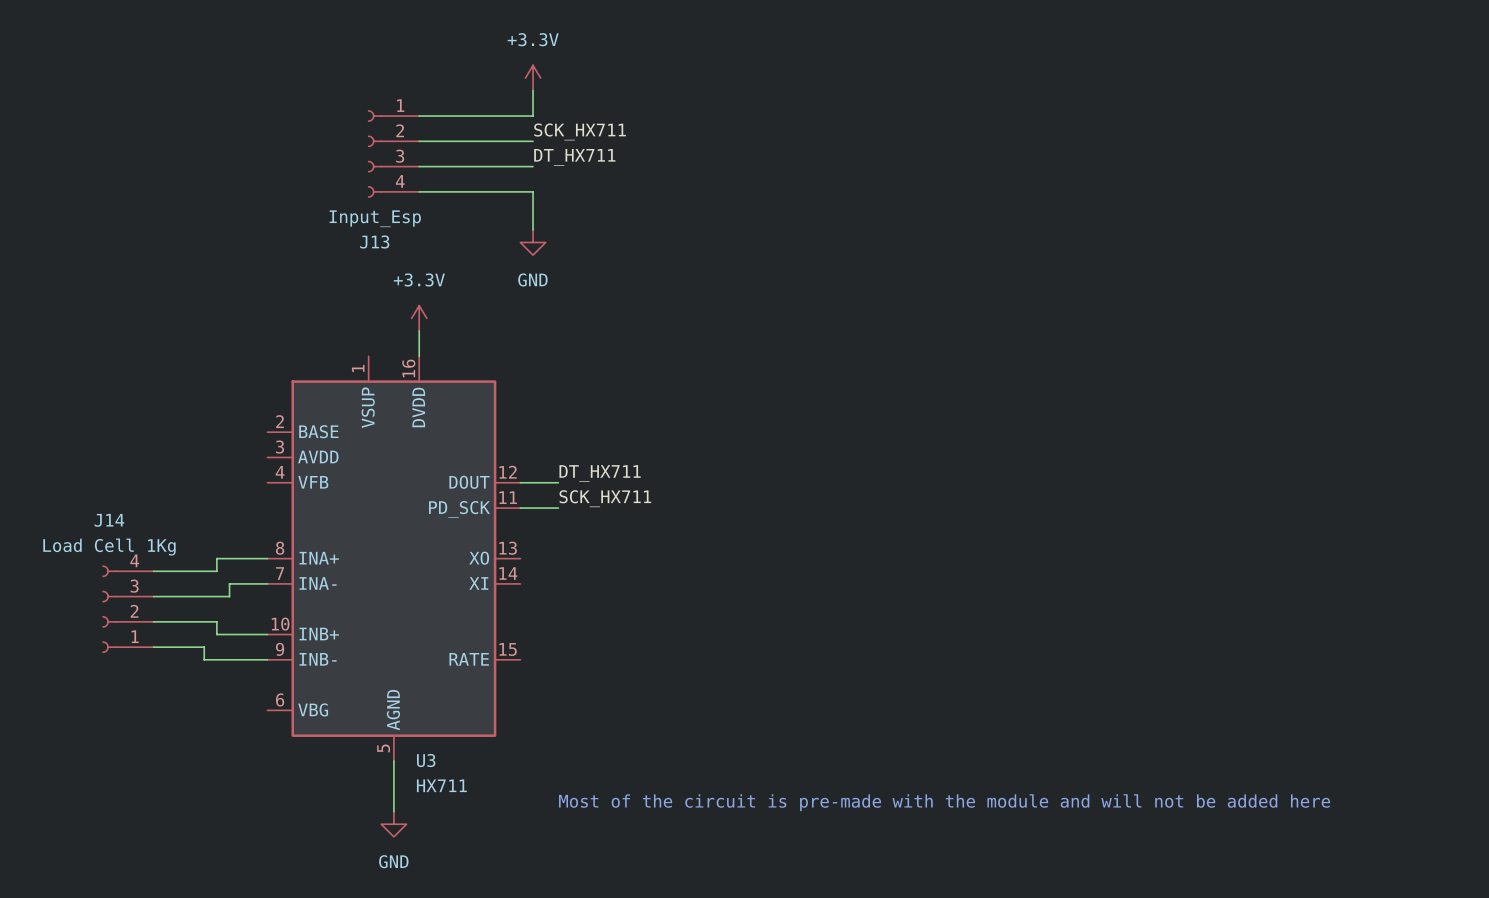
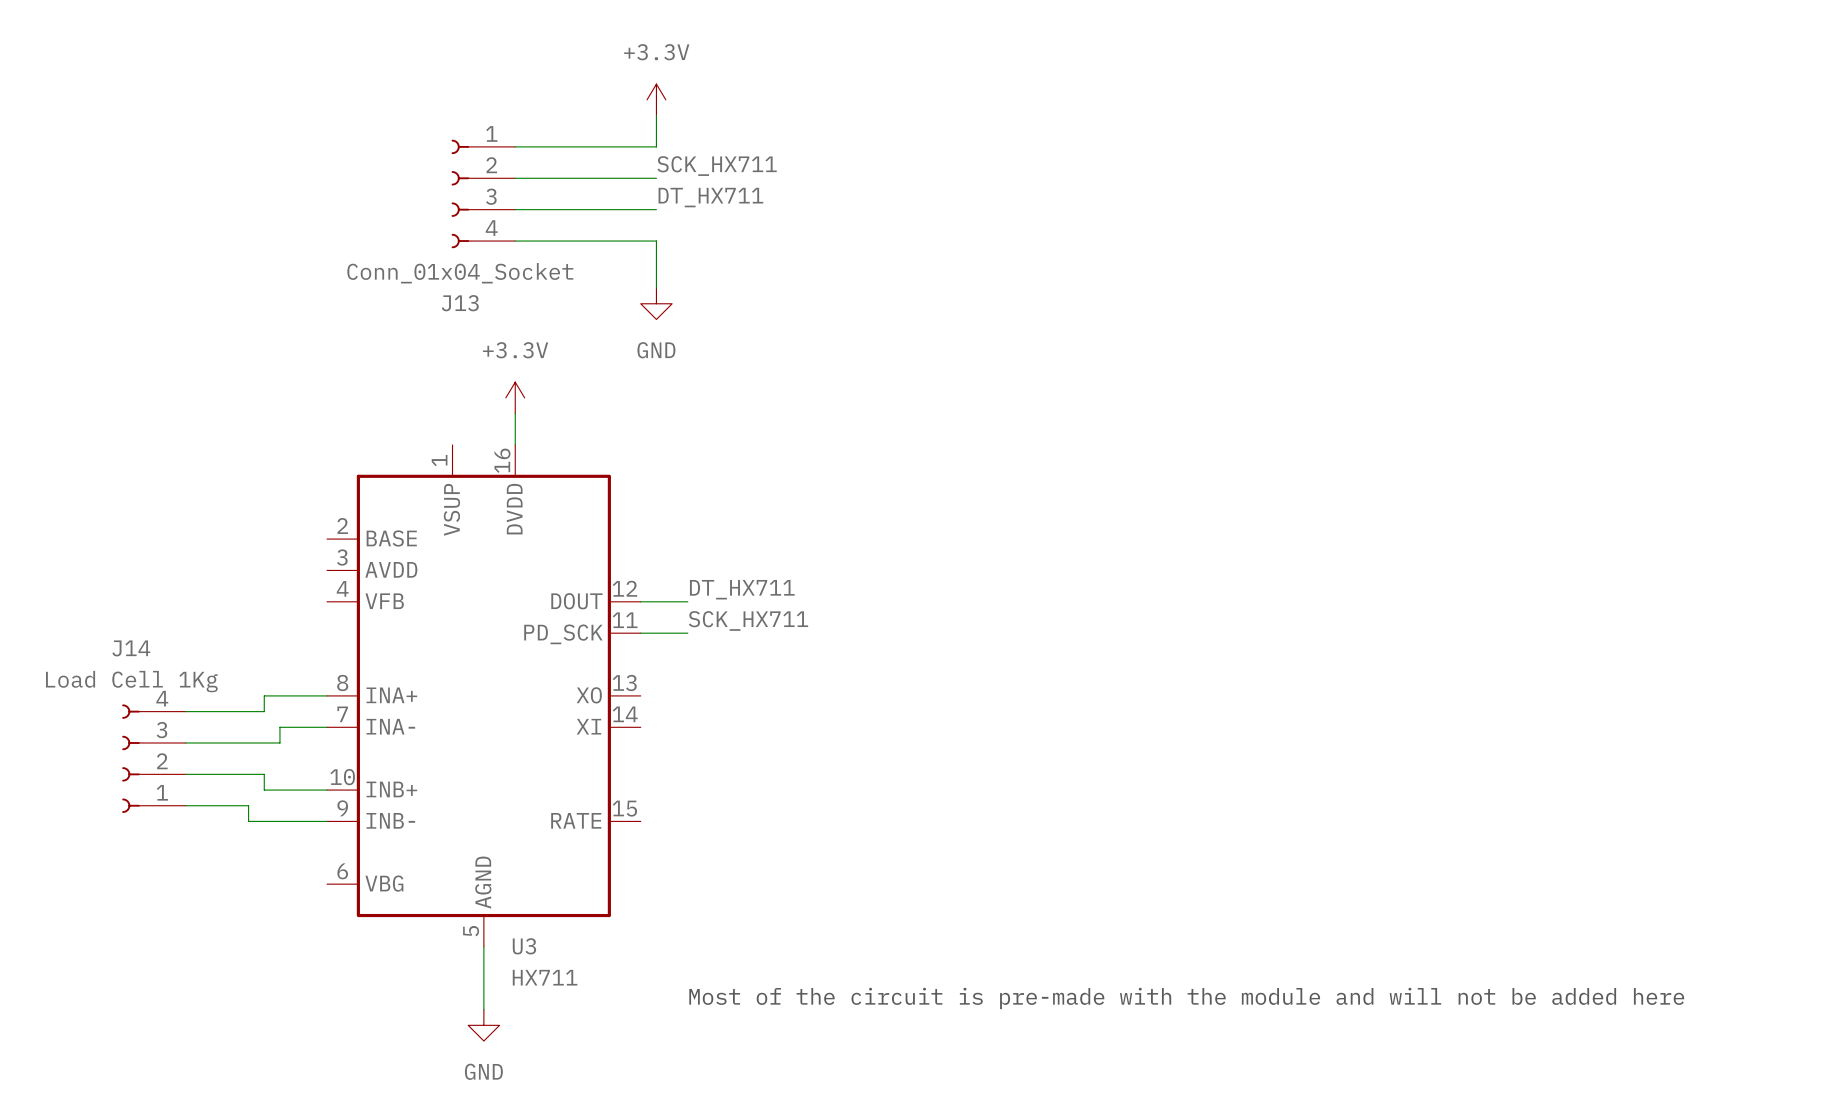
J13 value: Input_Esp (375, 218) -> Conn_01x04_Socket (460, 273)

